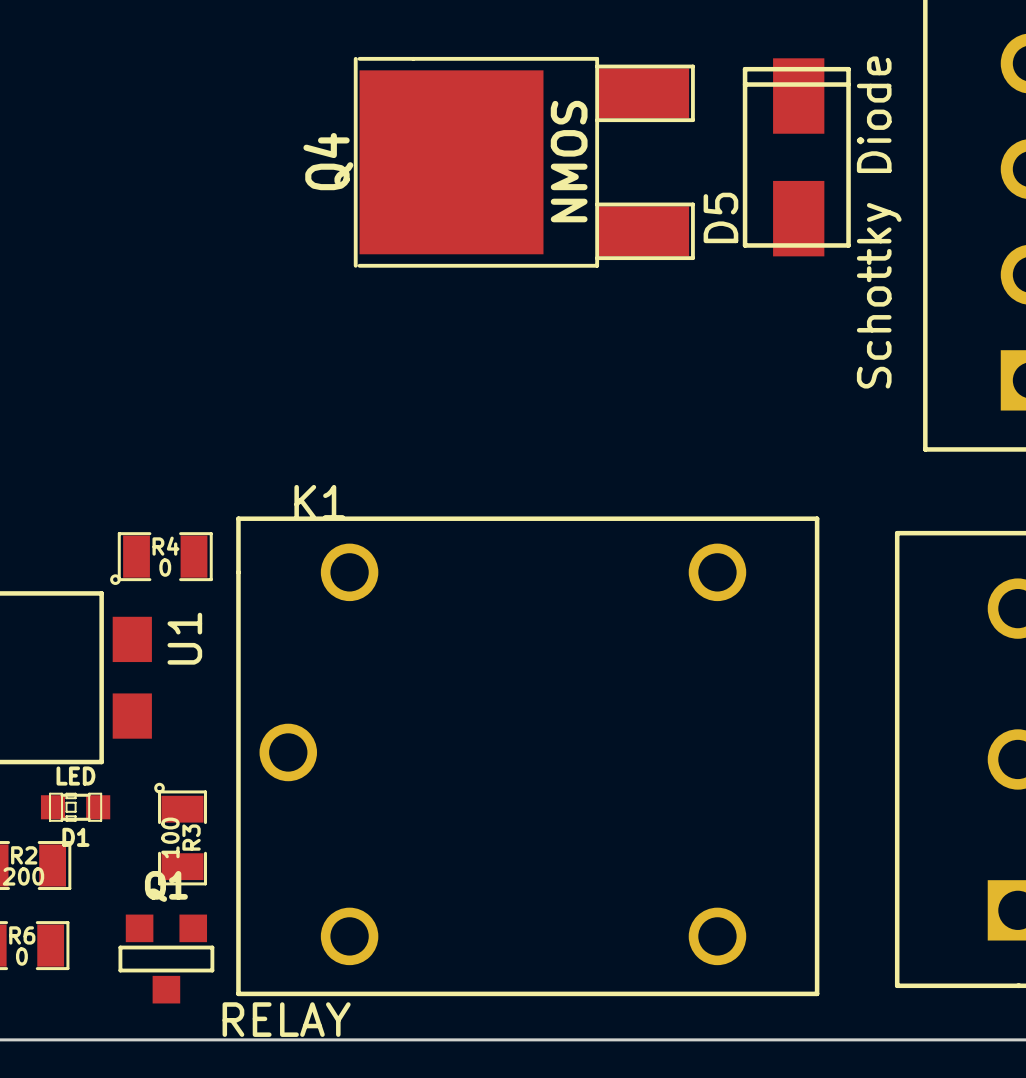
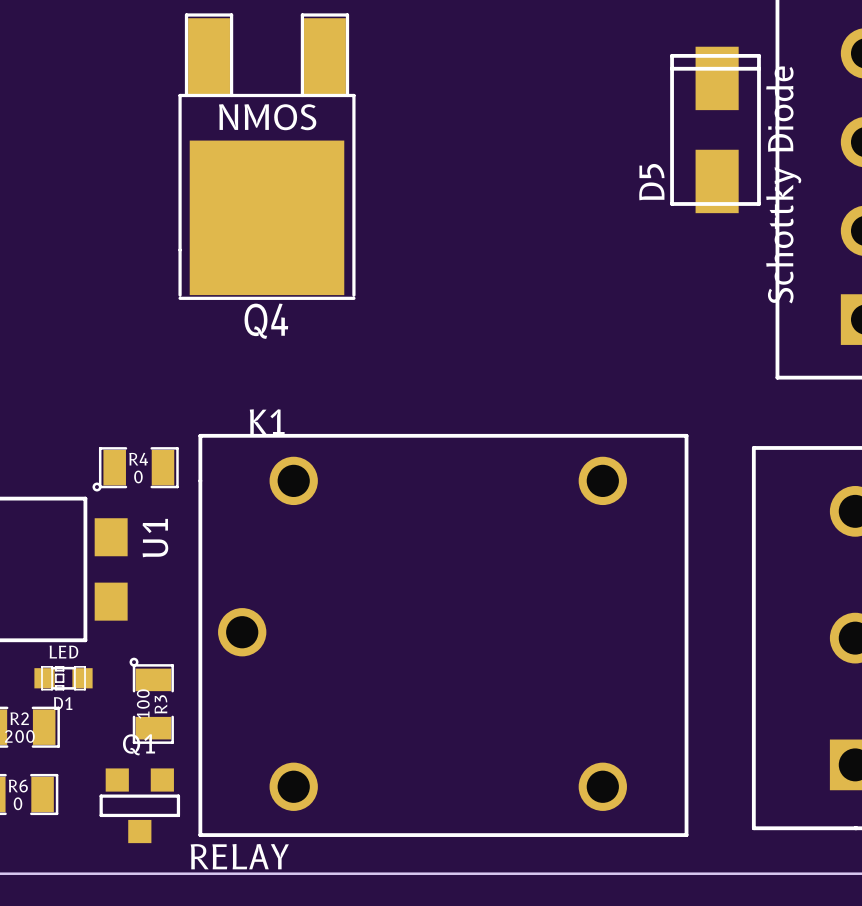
D5 position: (796, 157) -> (715, 129)
Q4 rotation: 0° (524, 162) -> 90° counterclockwise (267, 156)
Q4 position: (524, 162) -> (267, 156)

